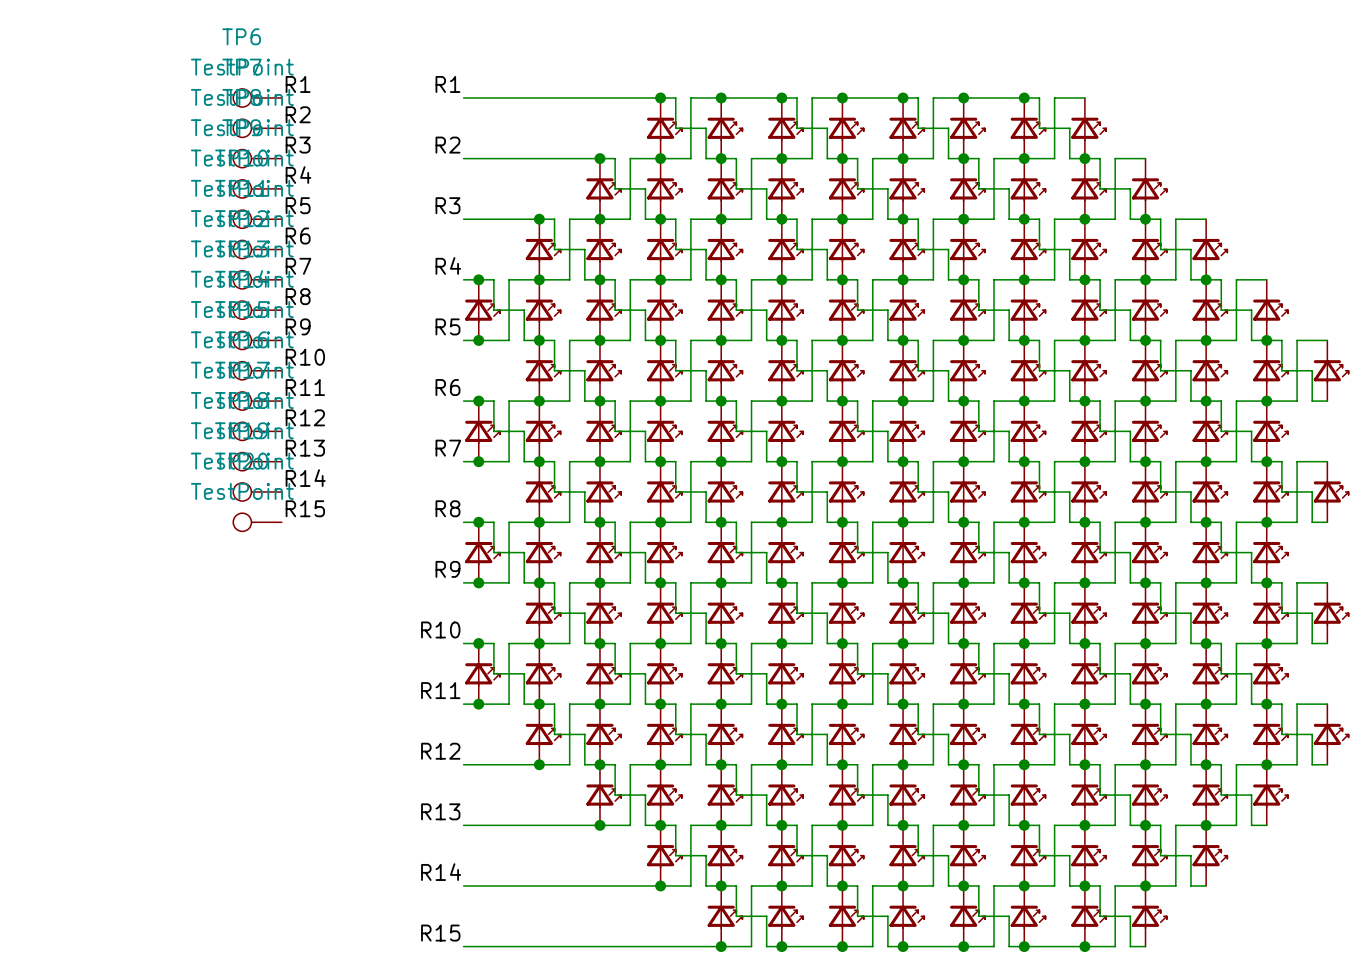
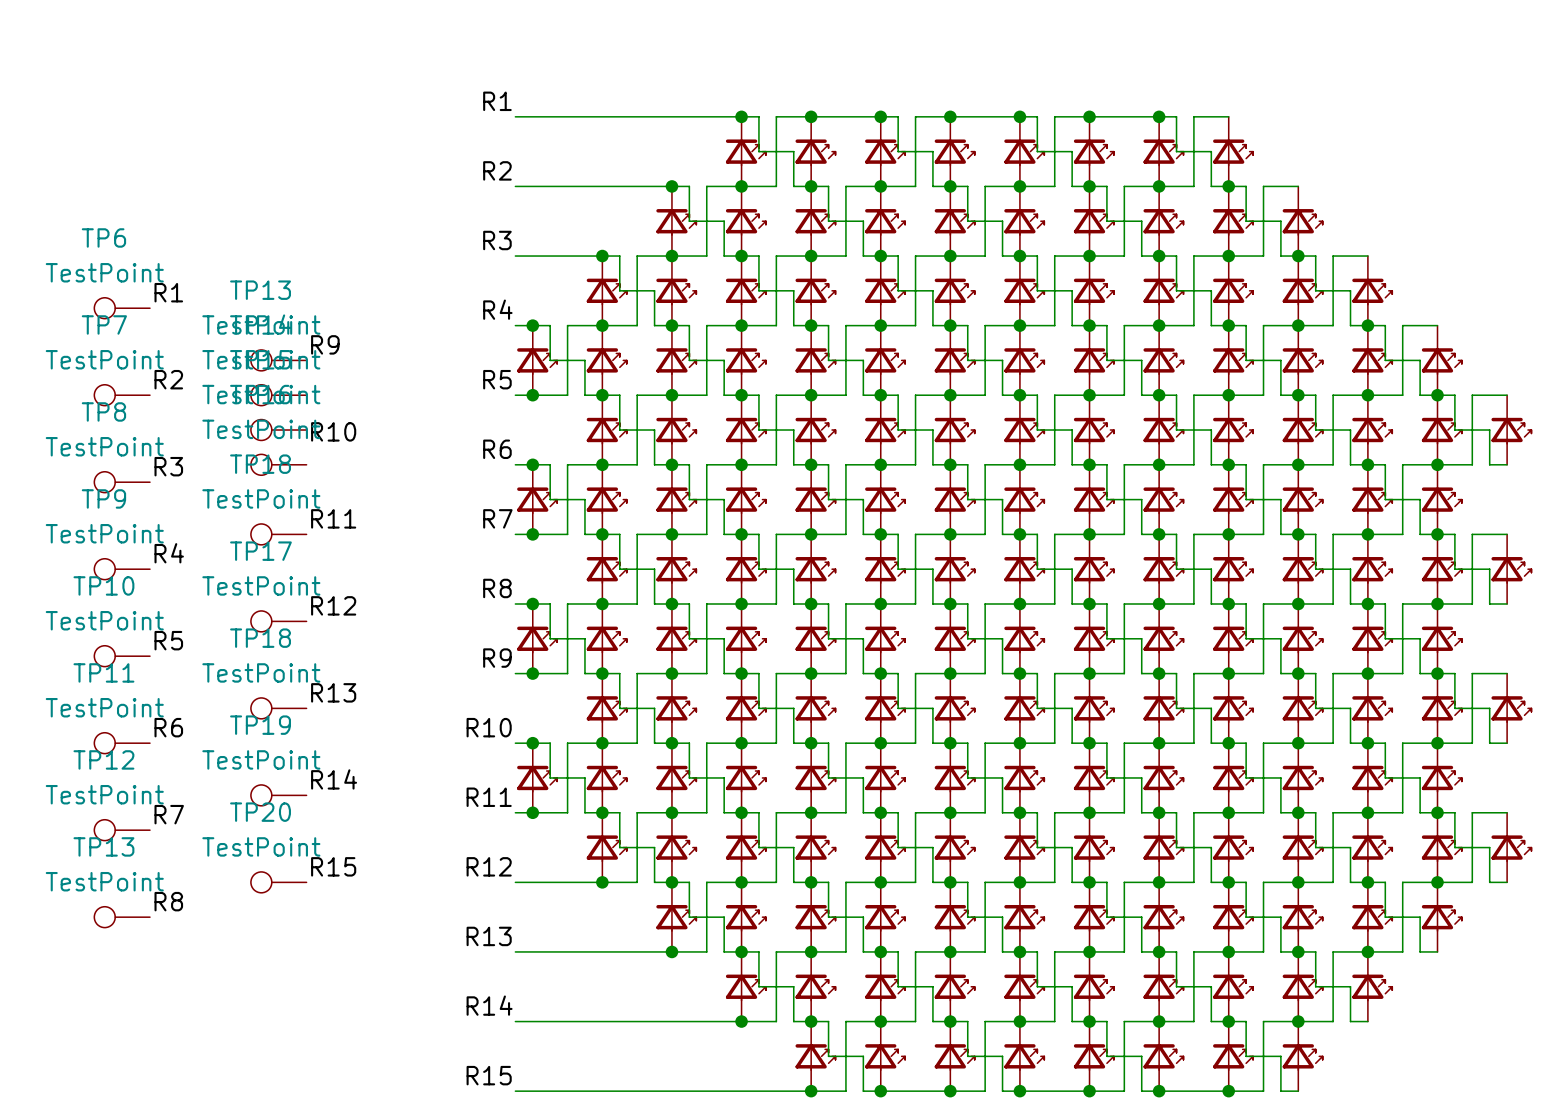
label position: R1 (298, 84) -> R1 (168, 292)
TP6 position: (257, 97) -> (122, 308)
label position: R2 (298, 114) -> R2 (168, 379)
TP7 position: (257, 128) -> (122, 395)
label position: R3 (298, 145) -> R3 (168, 466)
TP8 position: (257, 158) -> (122, 482)
label: R4 (298, 175) -> none
TP9 position: (257, 188) -> (122, 569)
label: R5 (298, 205) -> none
TP10 position: (257, 219) -> (122, 656)
label: R6 (298, 236) -> none
TP11 position: (257, 249) -> (122, 743)
label: R7 (298, 266) -> none
TP12 position: (257, 279) -> (122, 830)
label: R8 (298, 296) -> R9 (325, 344)
label: R9 (298, 326) -> none
label position: R10 (305, 357) -> R10 (333, 431)
label: R11 (305, 387) -> none
label position: R12 (305, 417) -> R12 (333, 605)
TP17 position: (257, 431) -> (278, 621)
label: R13 (305, 448) -> R11 (333, 518)
label: none -> R4 (169, 553)
label position: R14 (305, 478) -> R14 (334, 779)
TP19 position: (257, 491) -> (278, 795)
label position: R15 (305, 508) -> R15 (333, 866)
TP20 position: (257, 522) -> (278, 882)
label: none -> R5 (168, 640)
label: none -> R13 (333, 692)
TP18: none -> TestPoint (278, 708)
label: none -> R6 (168, 727)
label: none -> R7 (169, 814)
label: none -> R8 (168, 901)
TP13: none -> TestPoint (122, 917)

